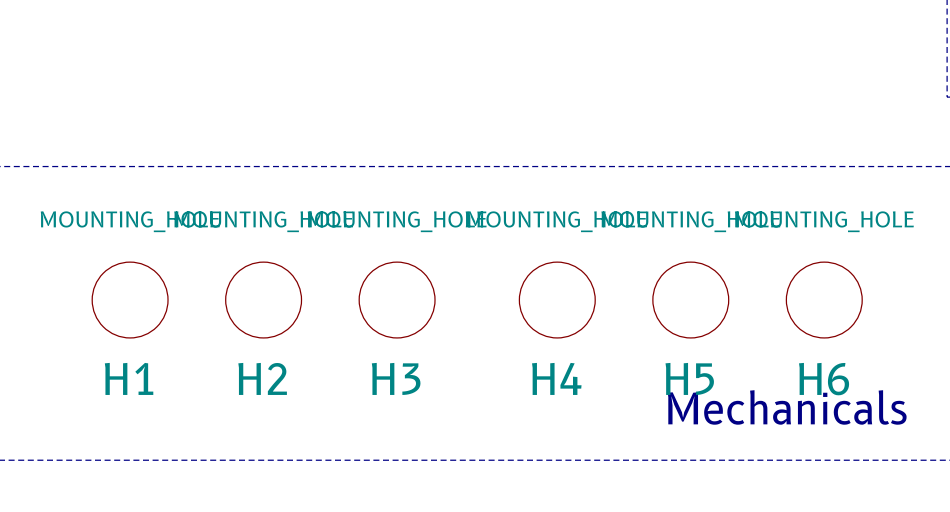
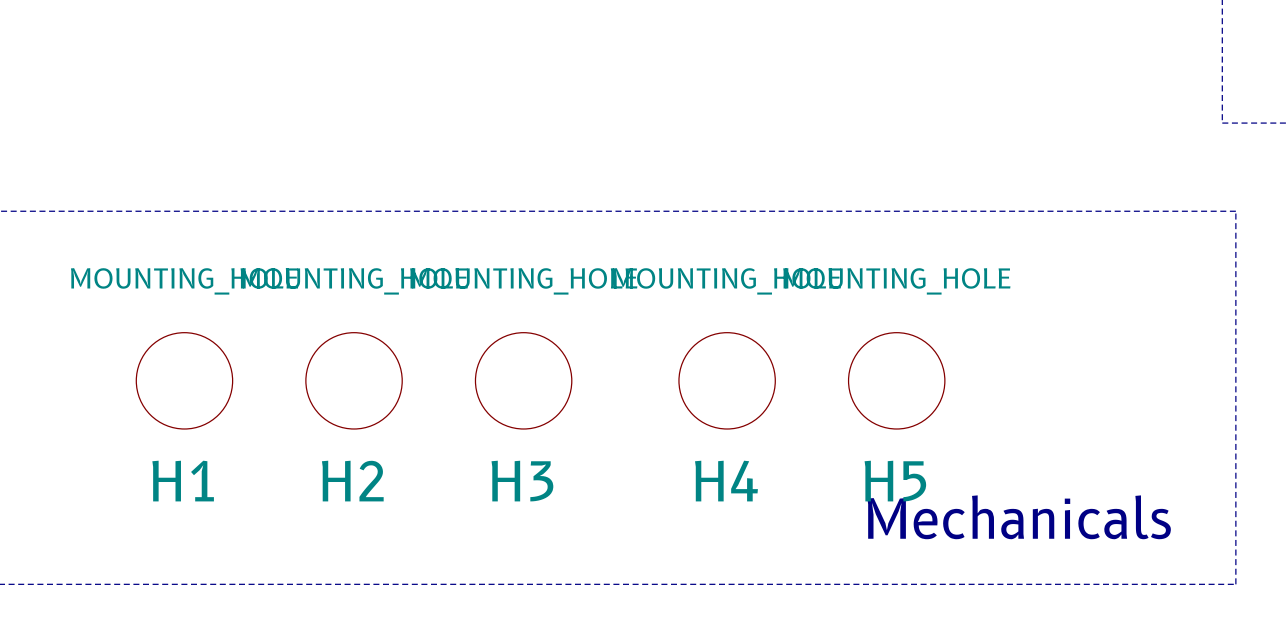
H6: MOUNTING_HOLE (824, 300) -> none

